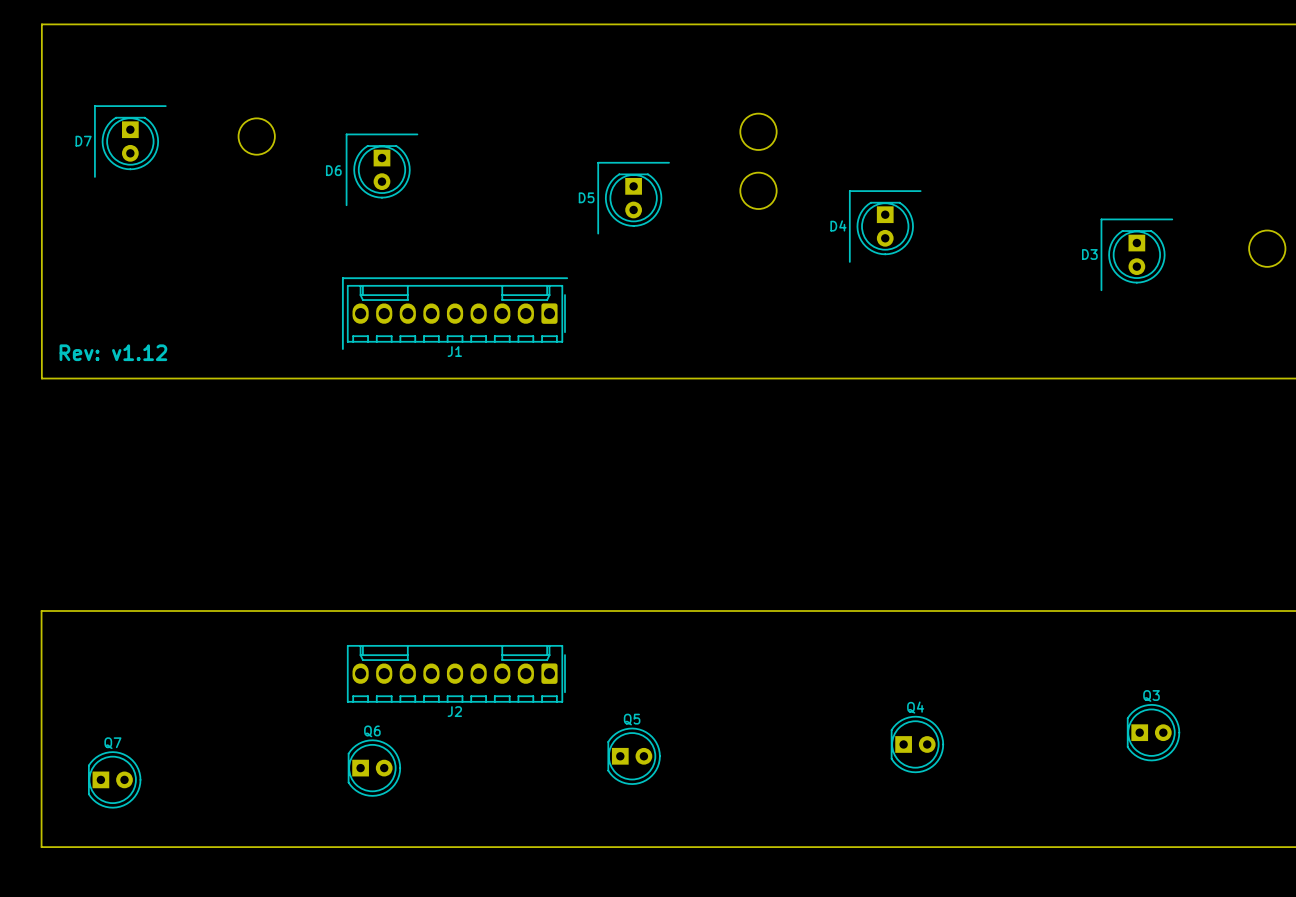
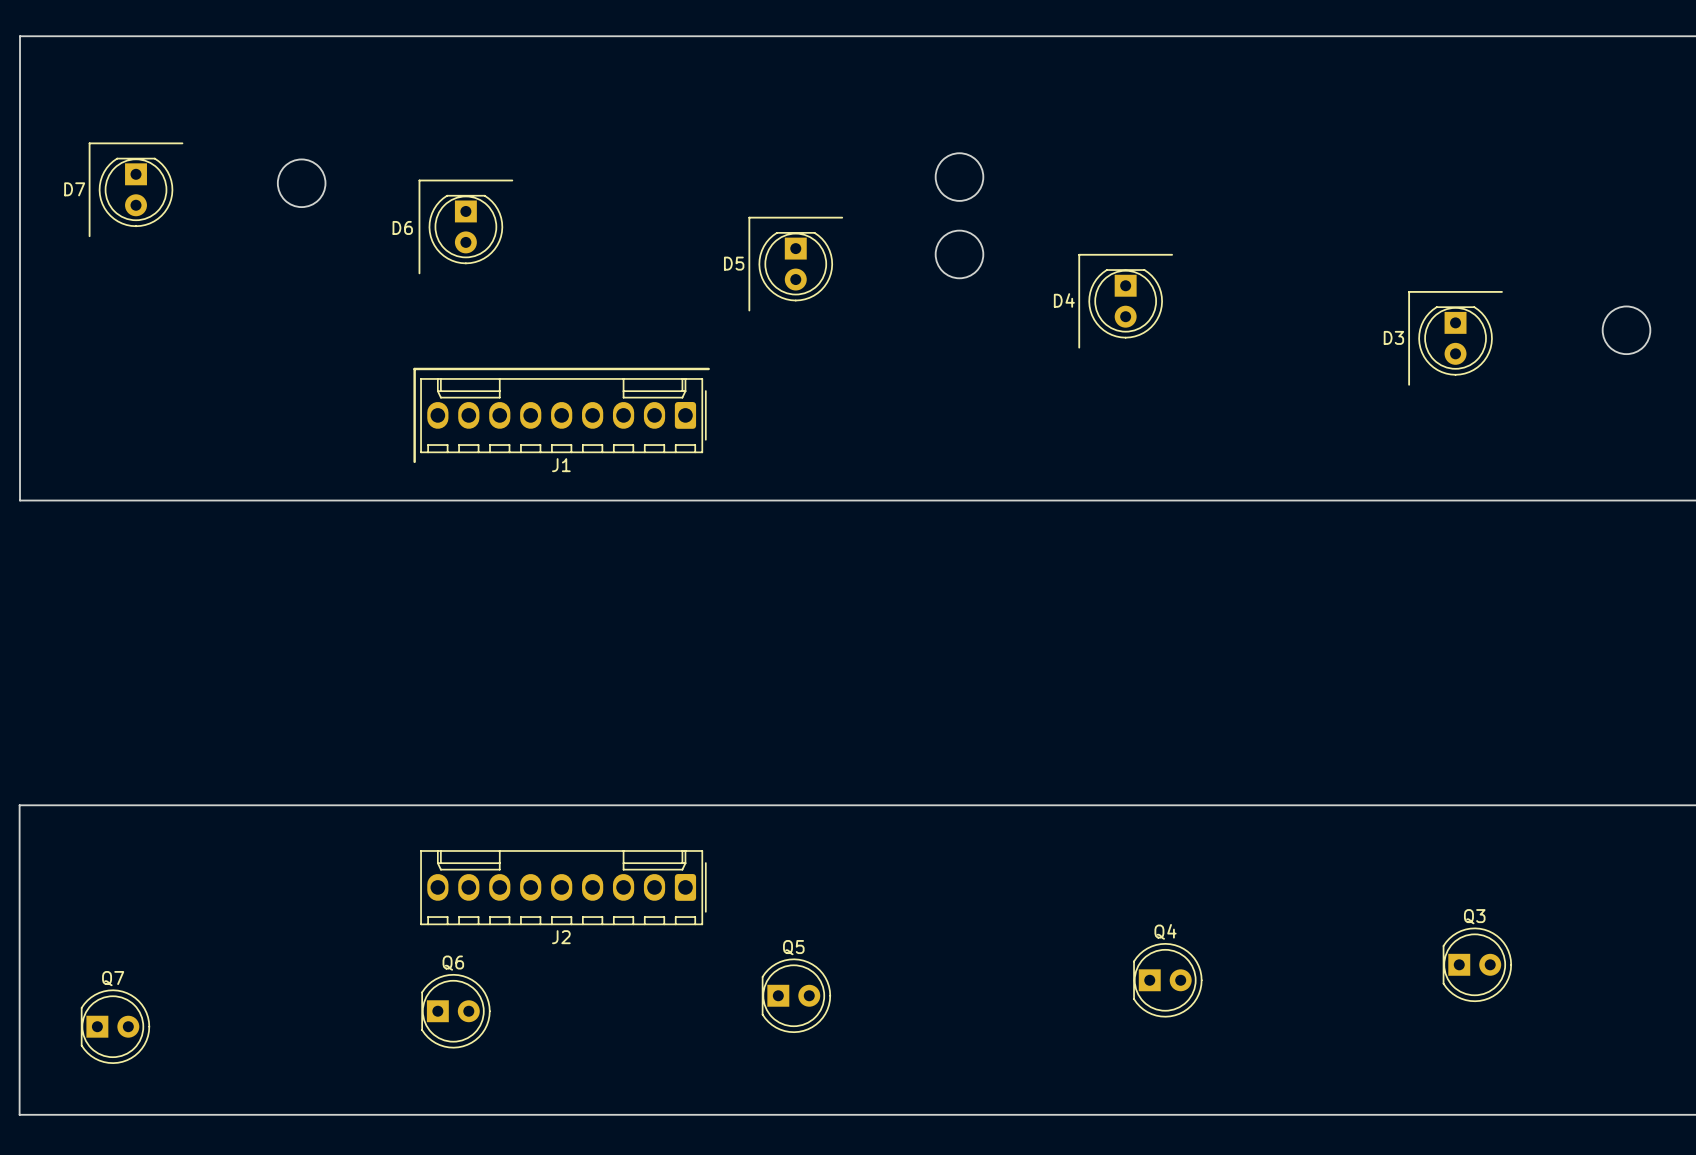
text: Rev: v1.12 (113, 352) -> none

